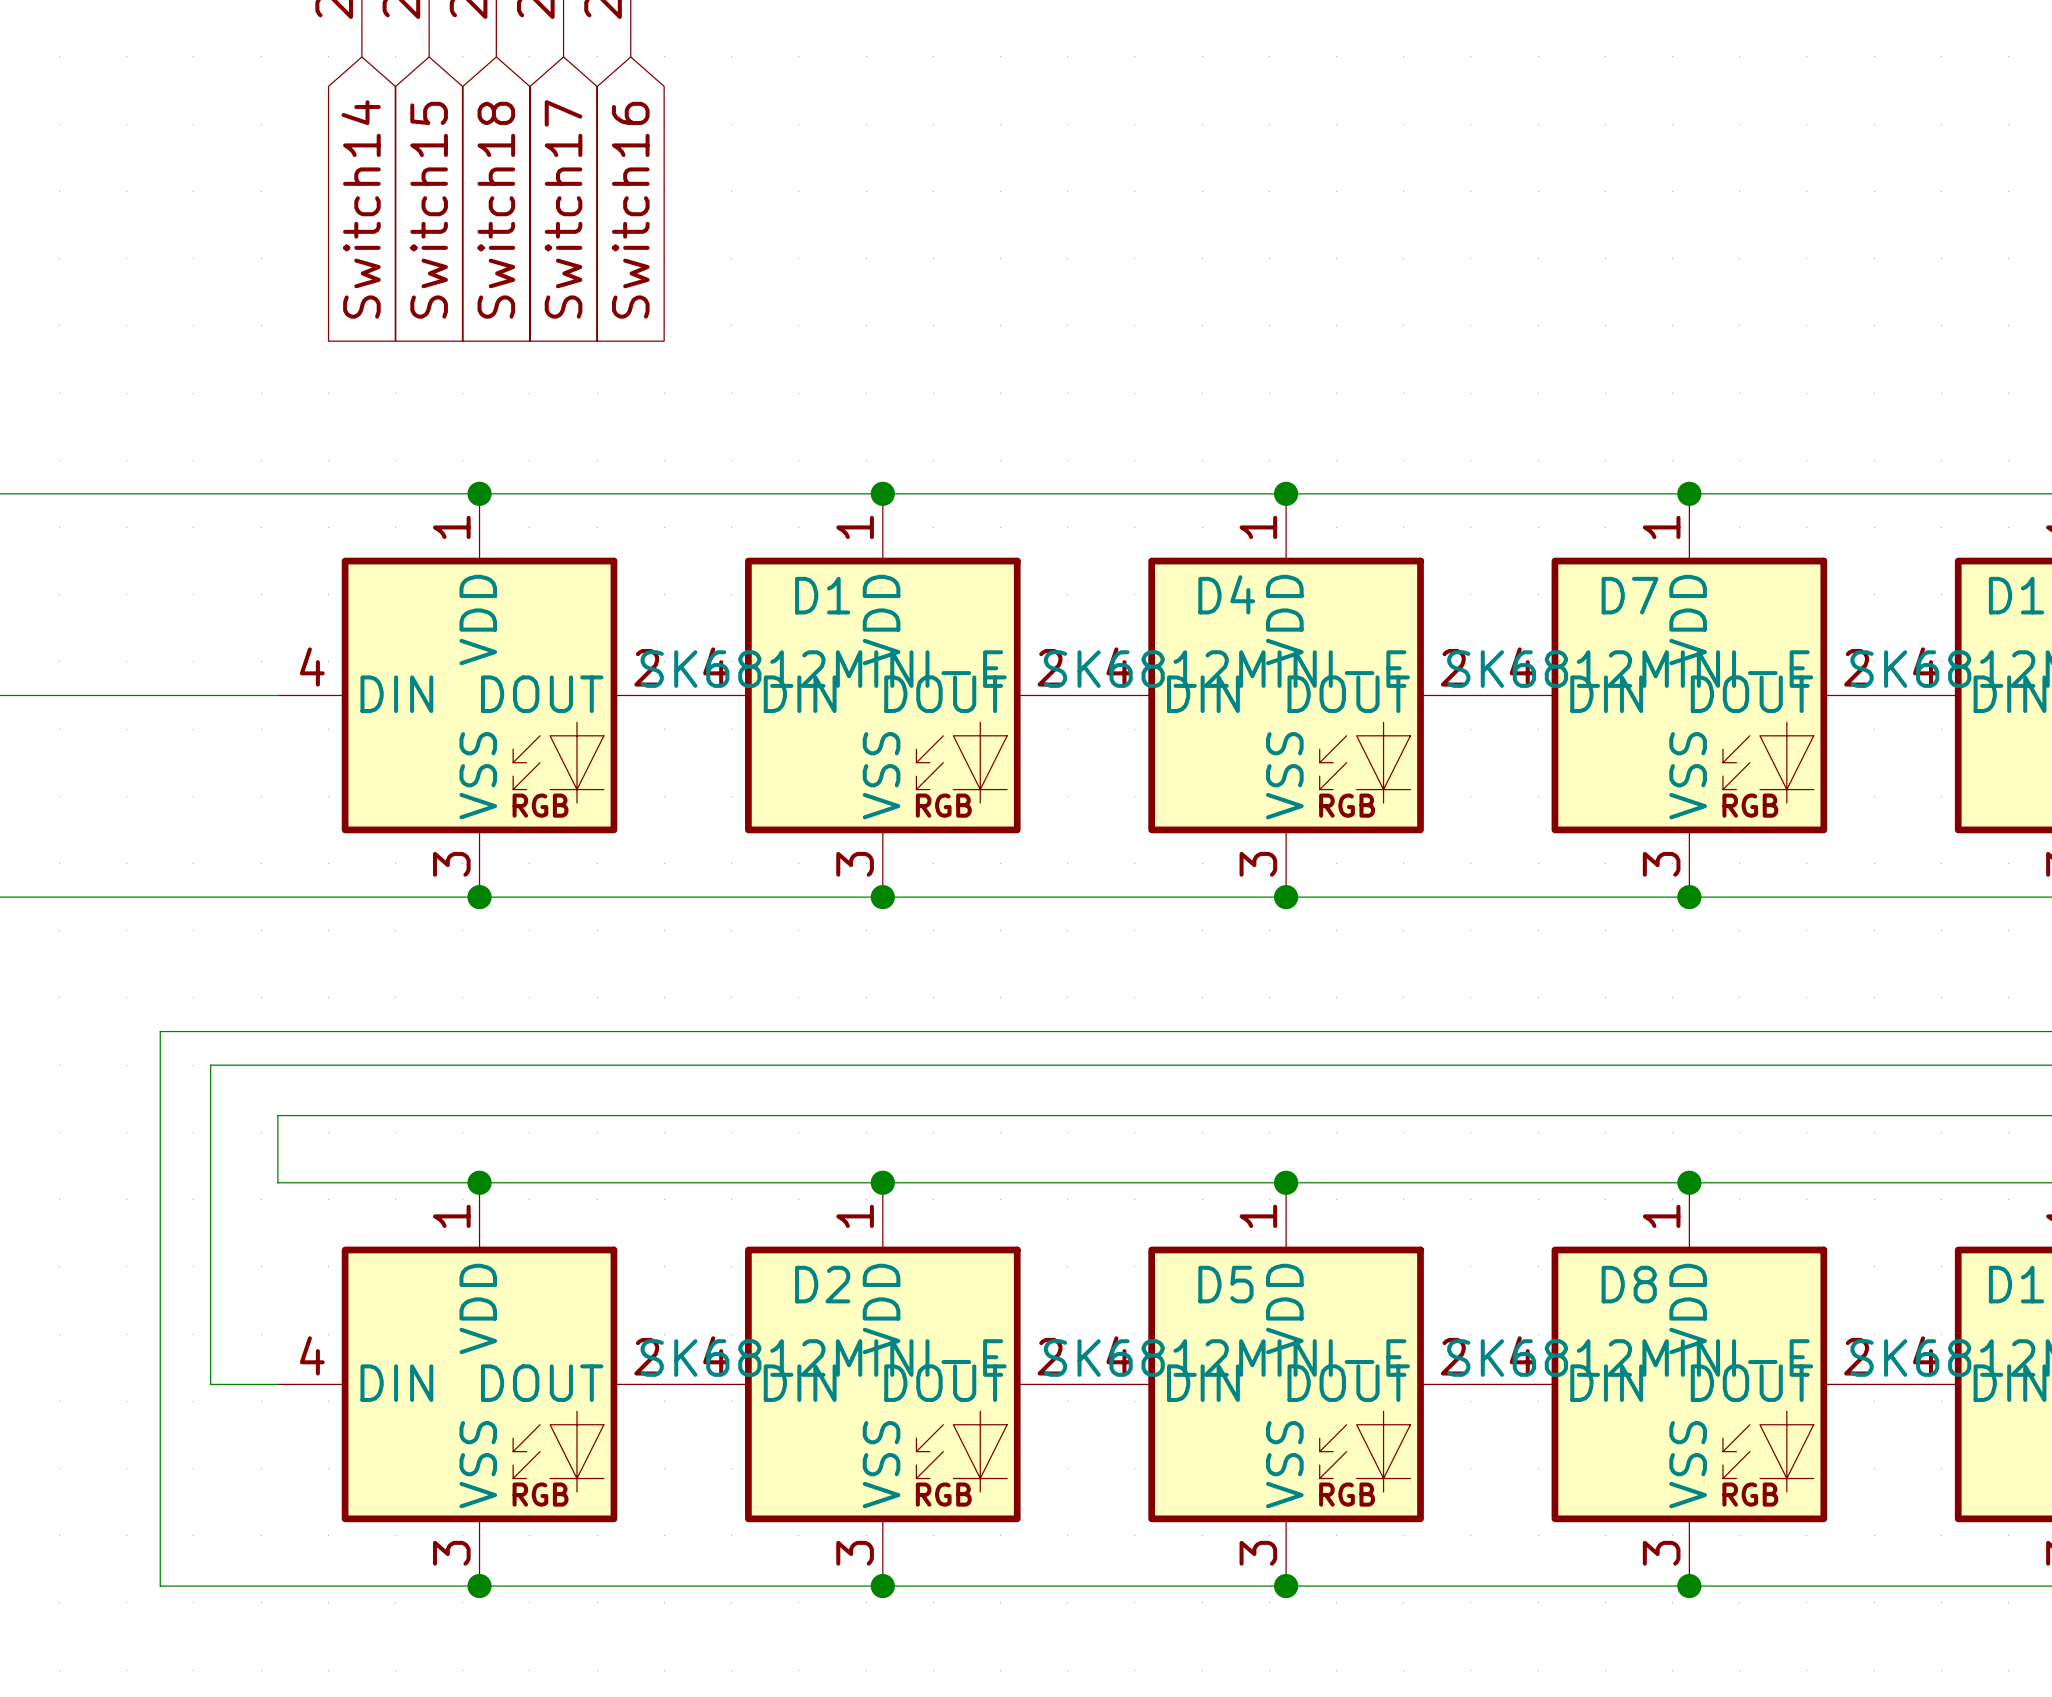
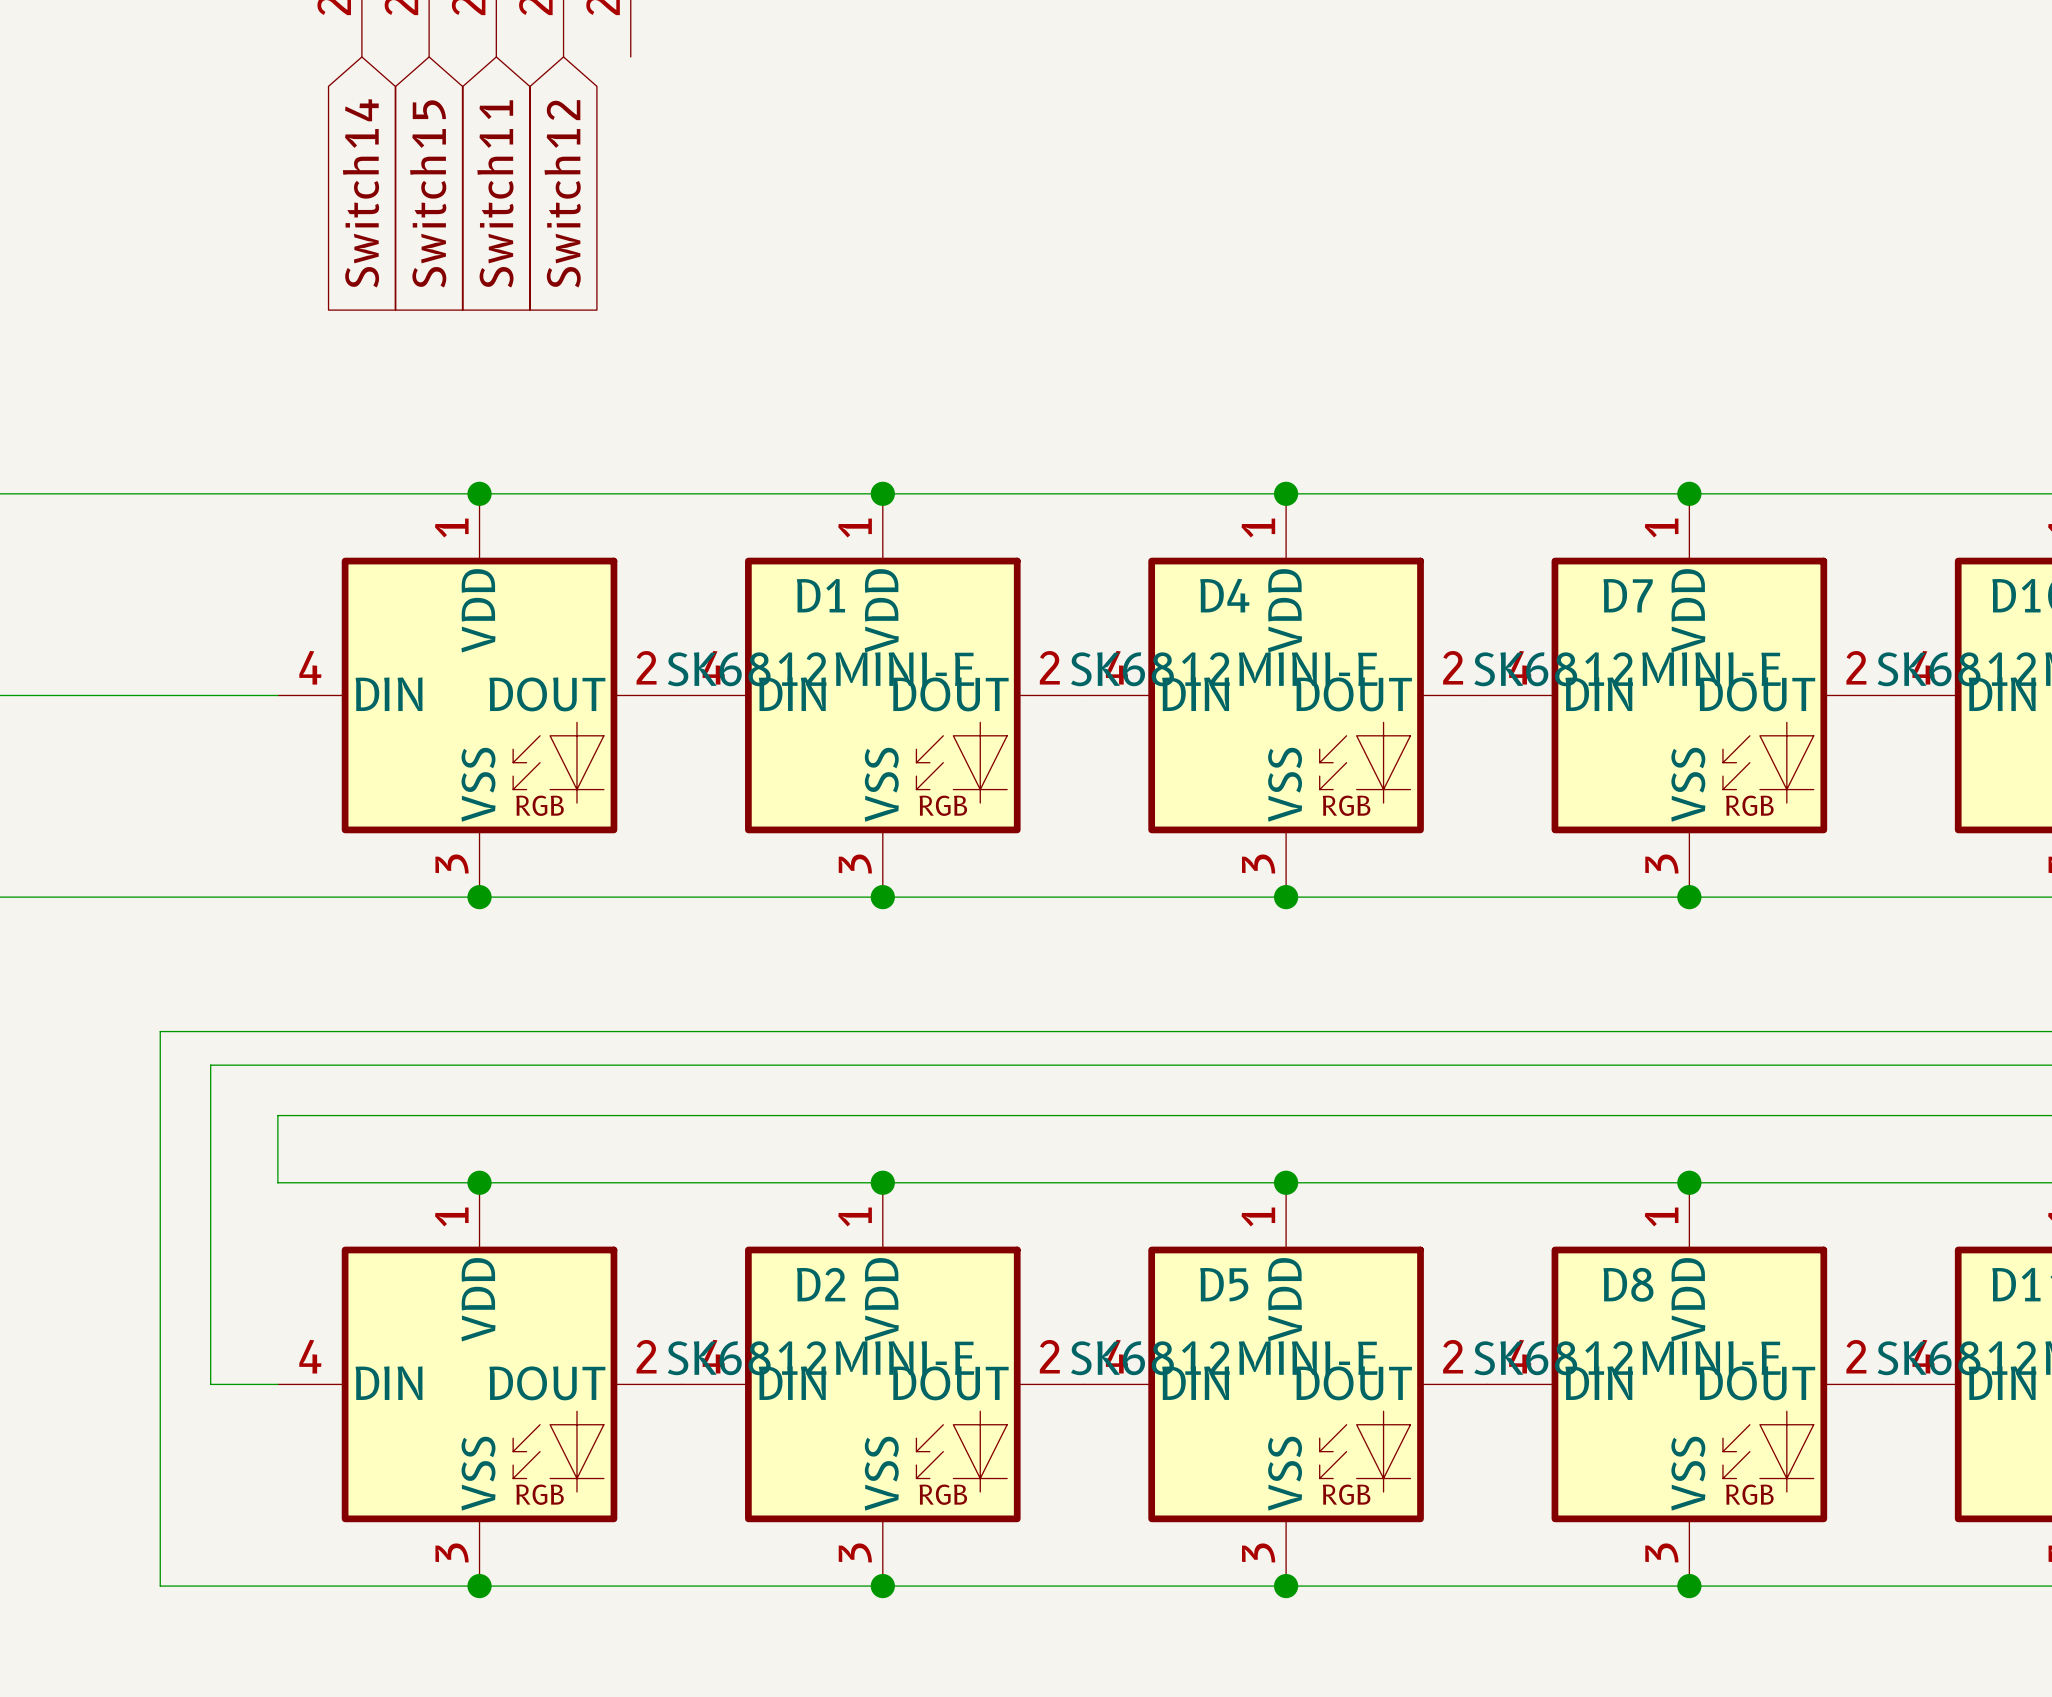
global label: Switch17 (563, 209) -> Switch12 (562, 193)
global label: Switch18 (496, 210) -> Switch11 (495, 193)
global label: Switch16 (630, 210) -> none

